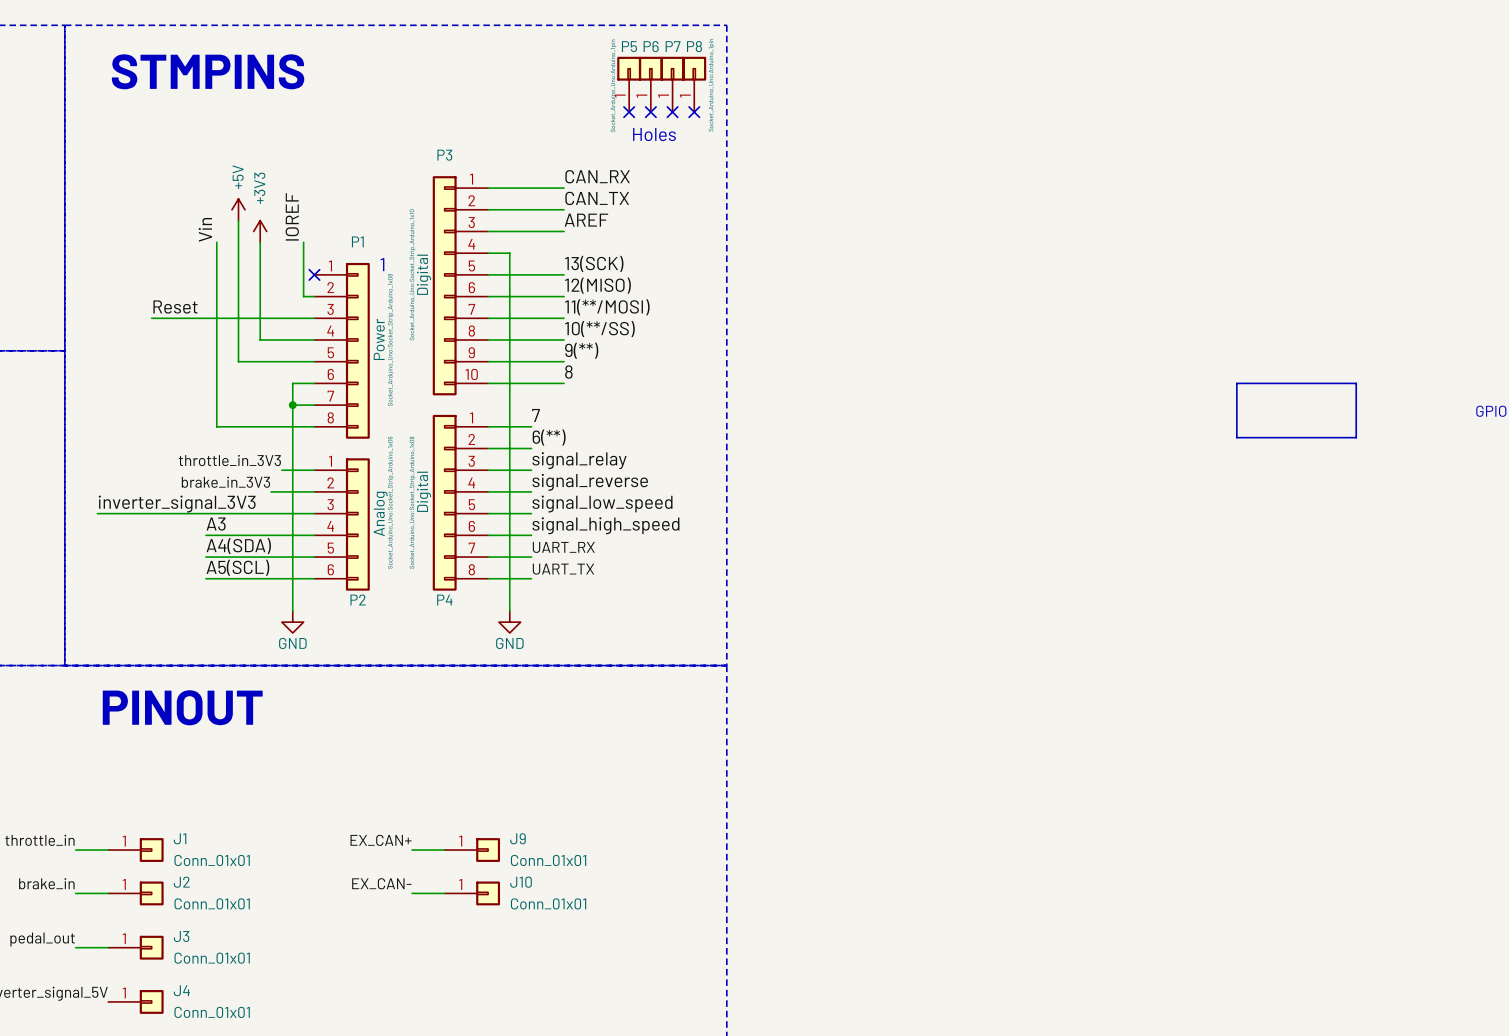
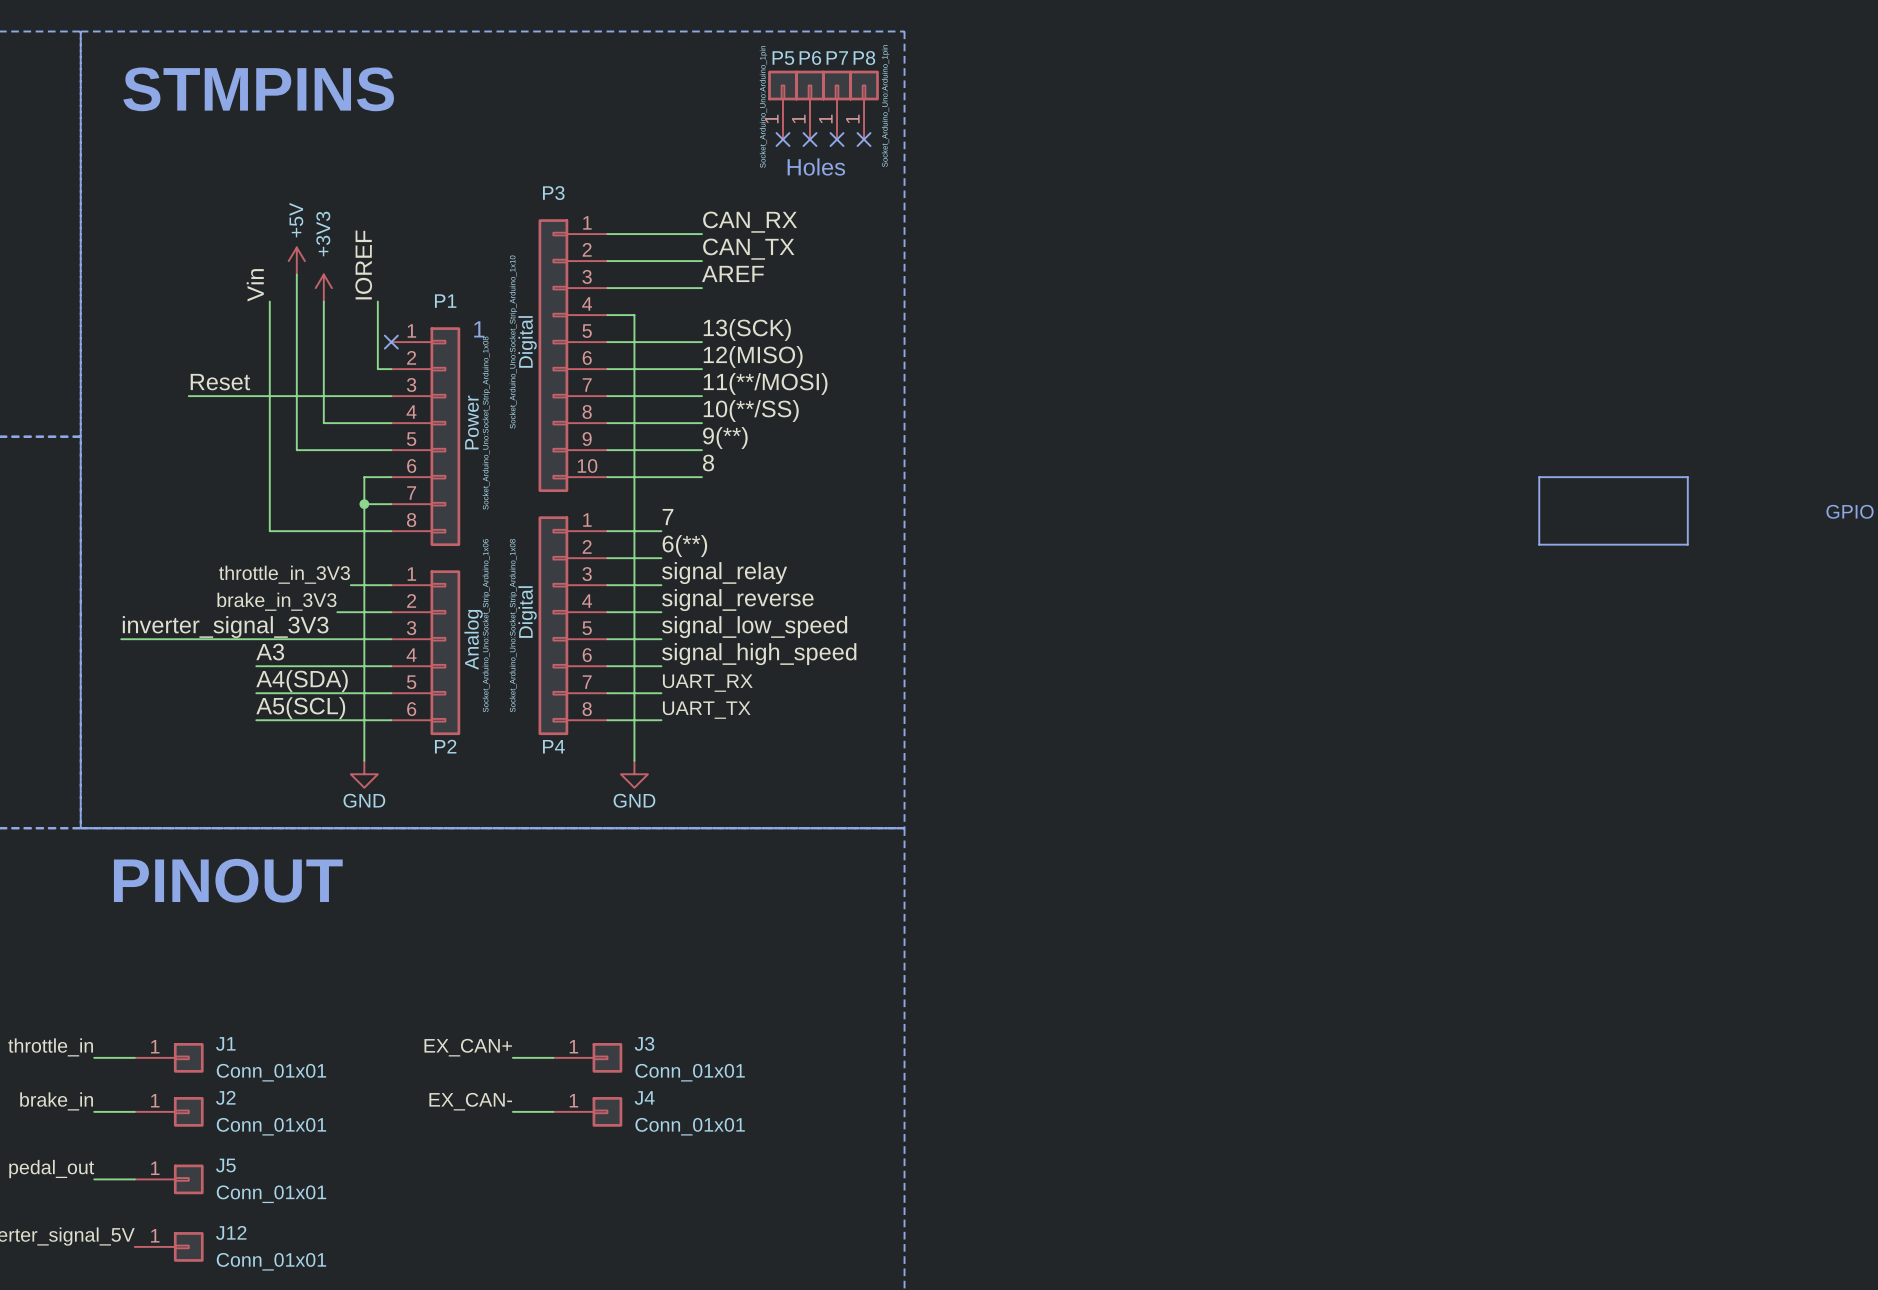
J9 name: J9 (518, 838) -> J3 (644, 1043)
J10 name: J10 (521, 882) -> J4 (644, 1097)
J3 name: J3 (181, 936) -> J5 (225, 1165)
J4 name: J4 (181, 990) -> J12 (231, 1232)

